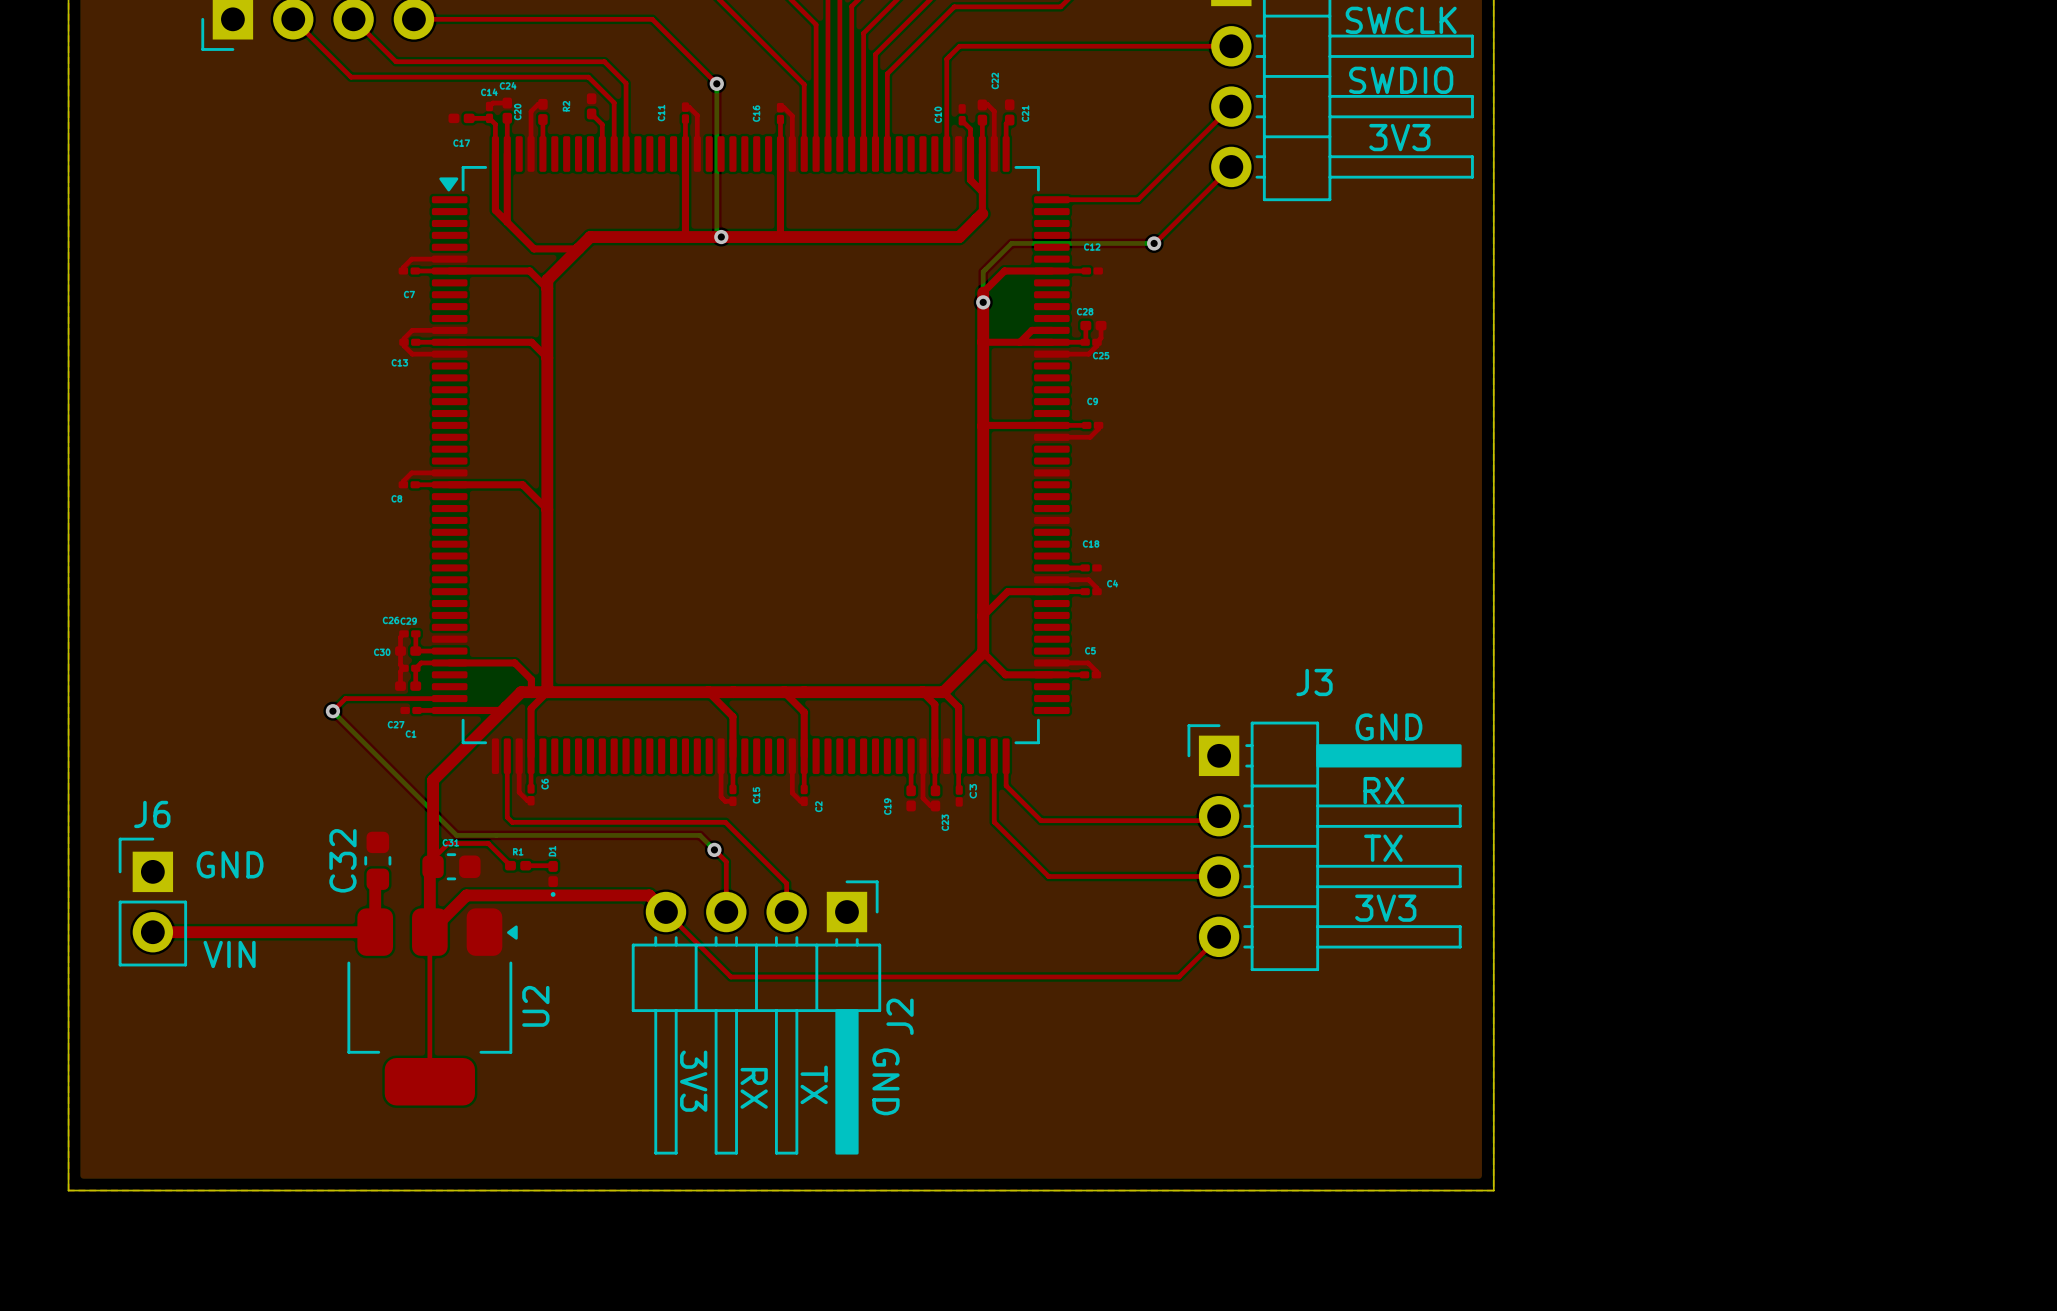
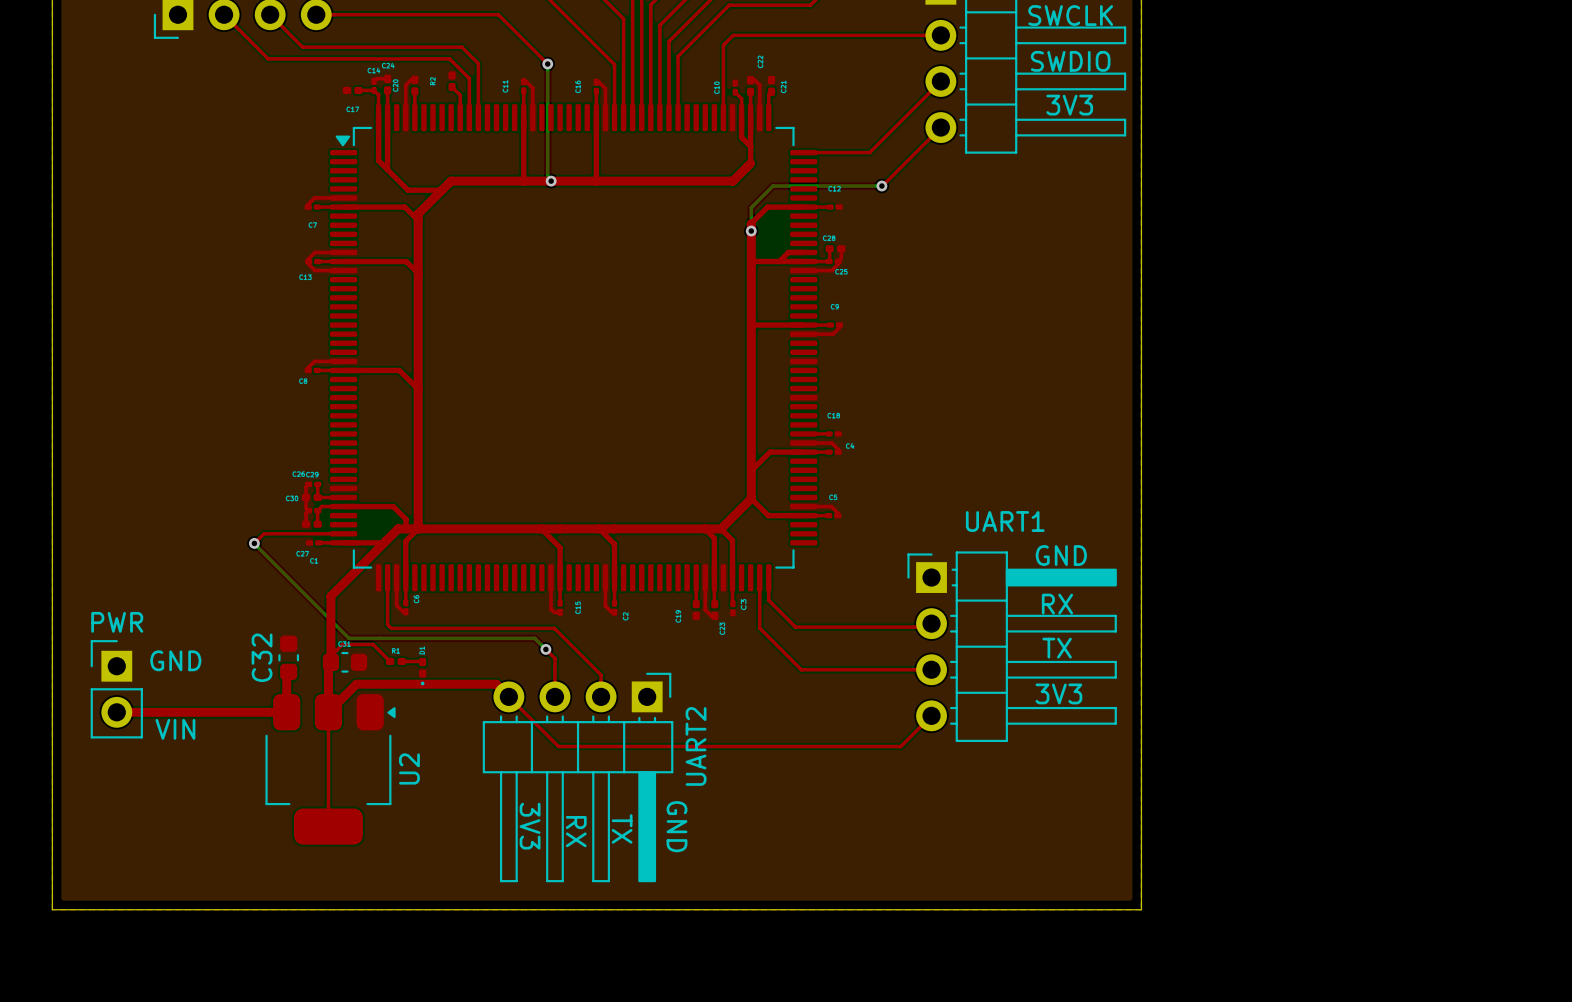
J3 name: J3 (1314, 682) -> UART1 (1005, 521)
J6 name: J6 (152, 814) -> PWR (117, 622)
J2 name: J2 (900, 1016) -> UART2 (696, 746)

